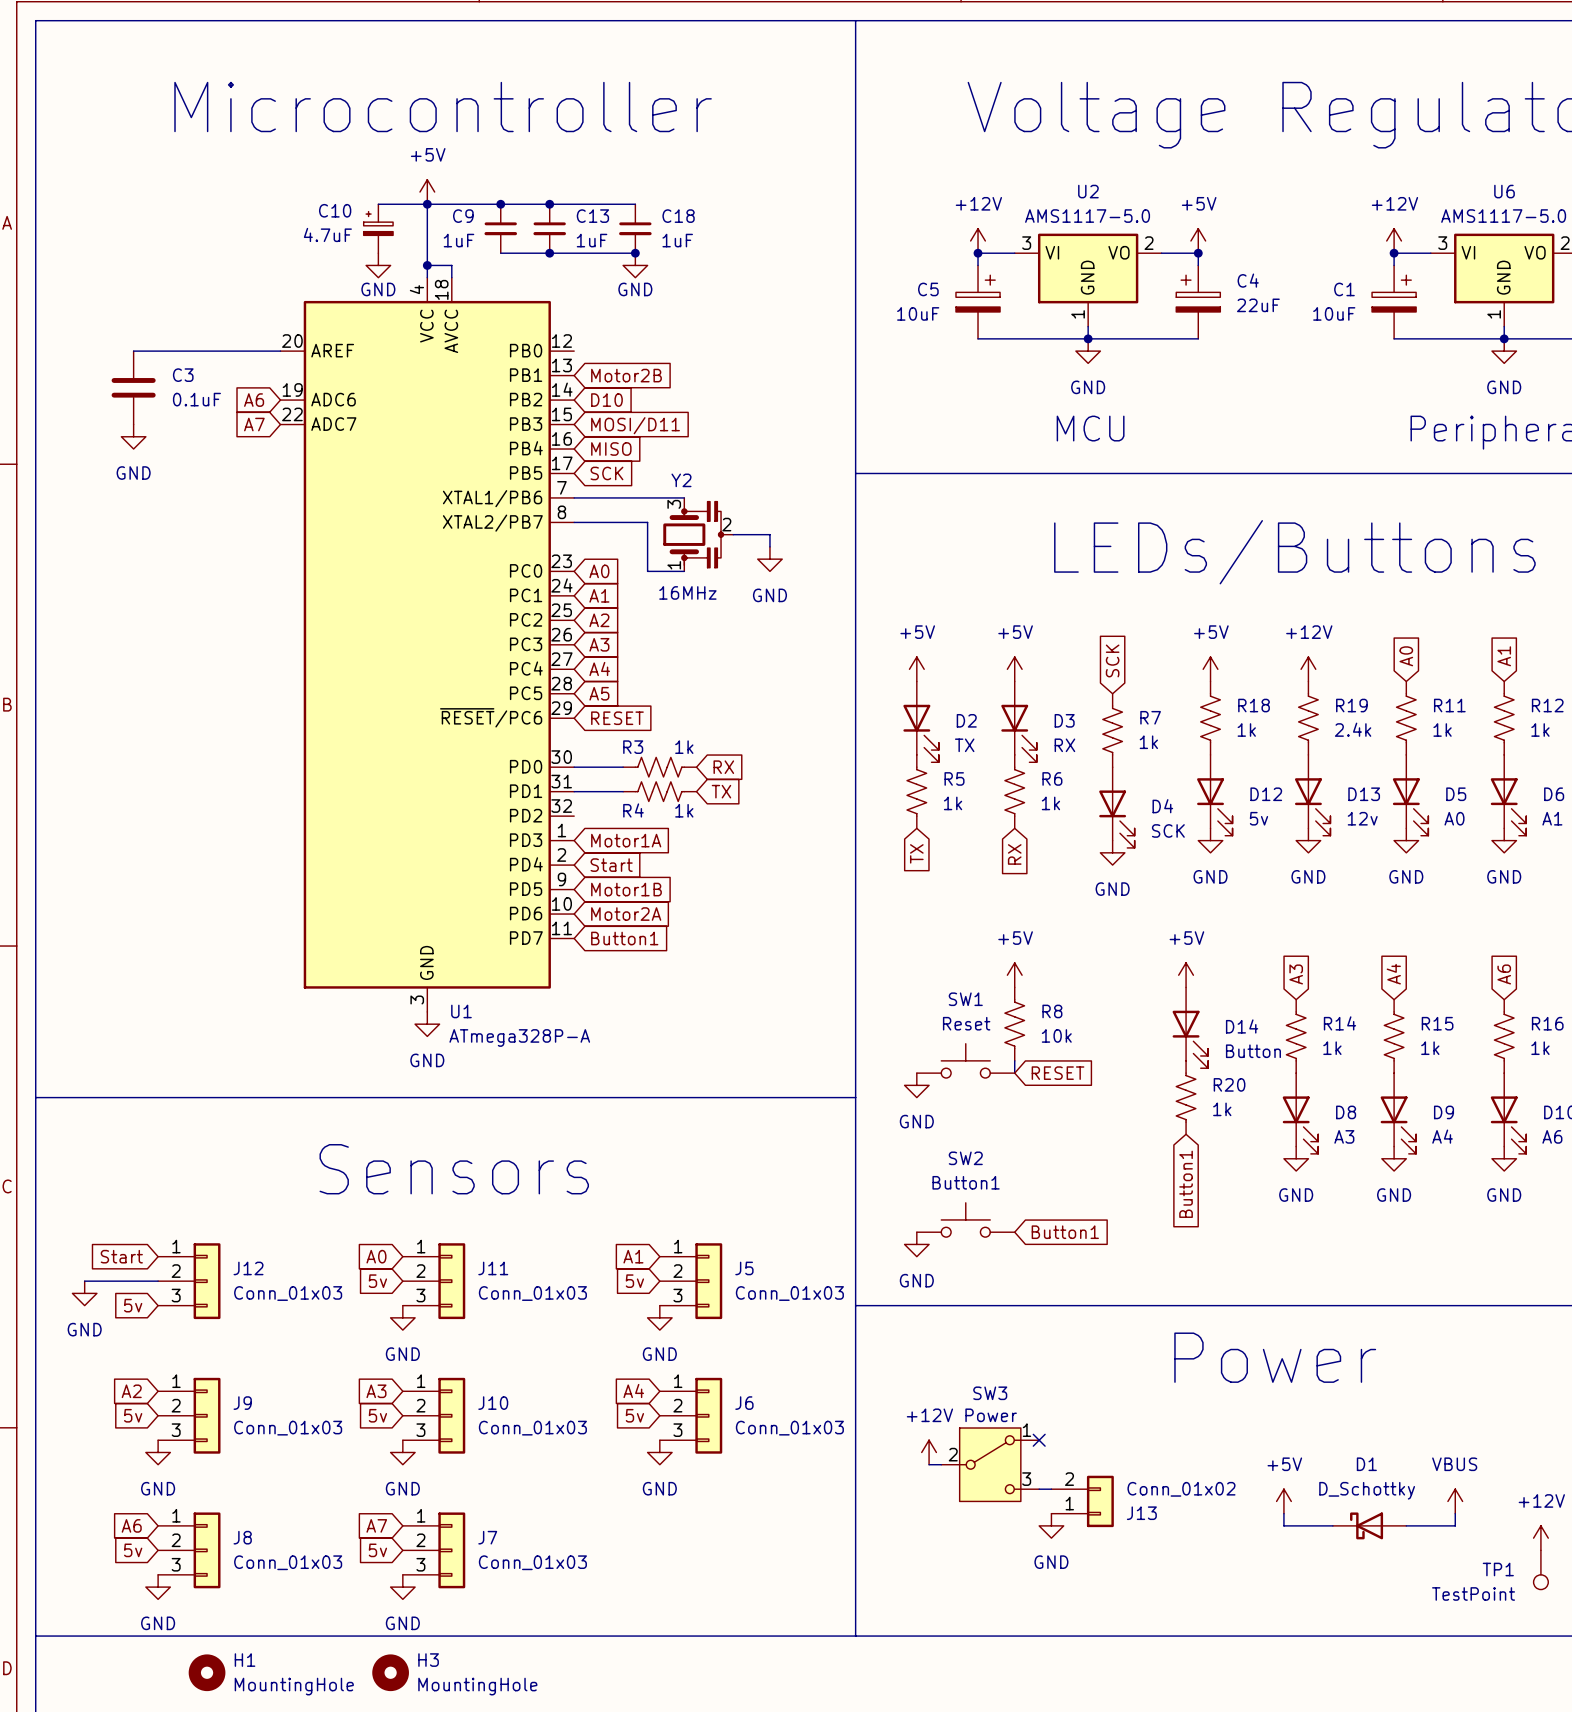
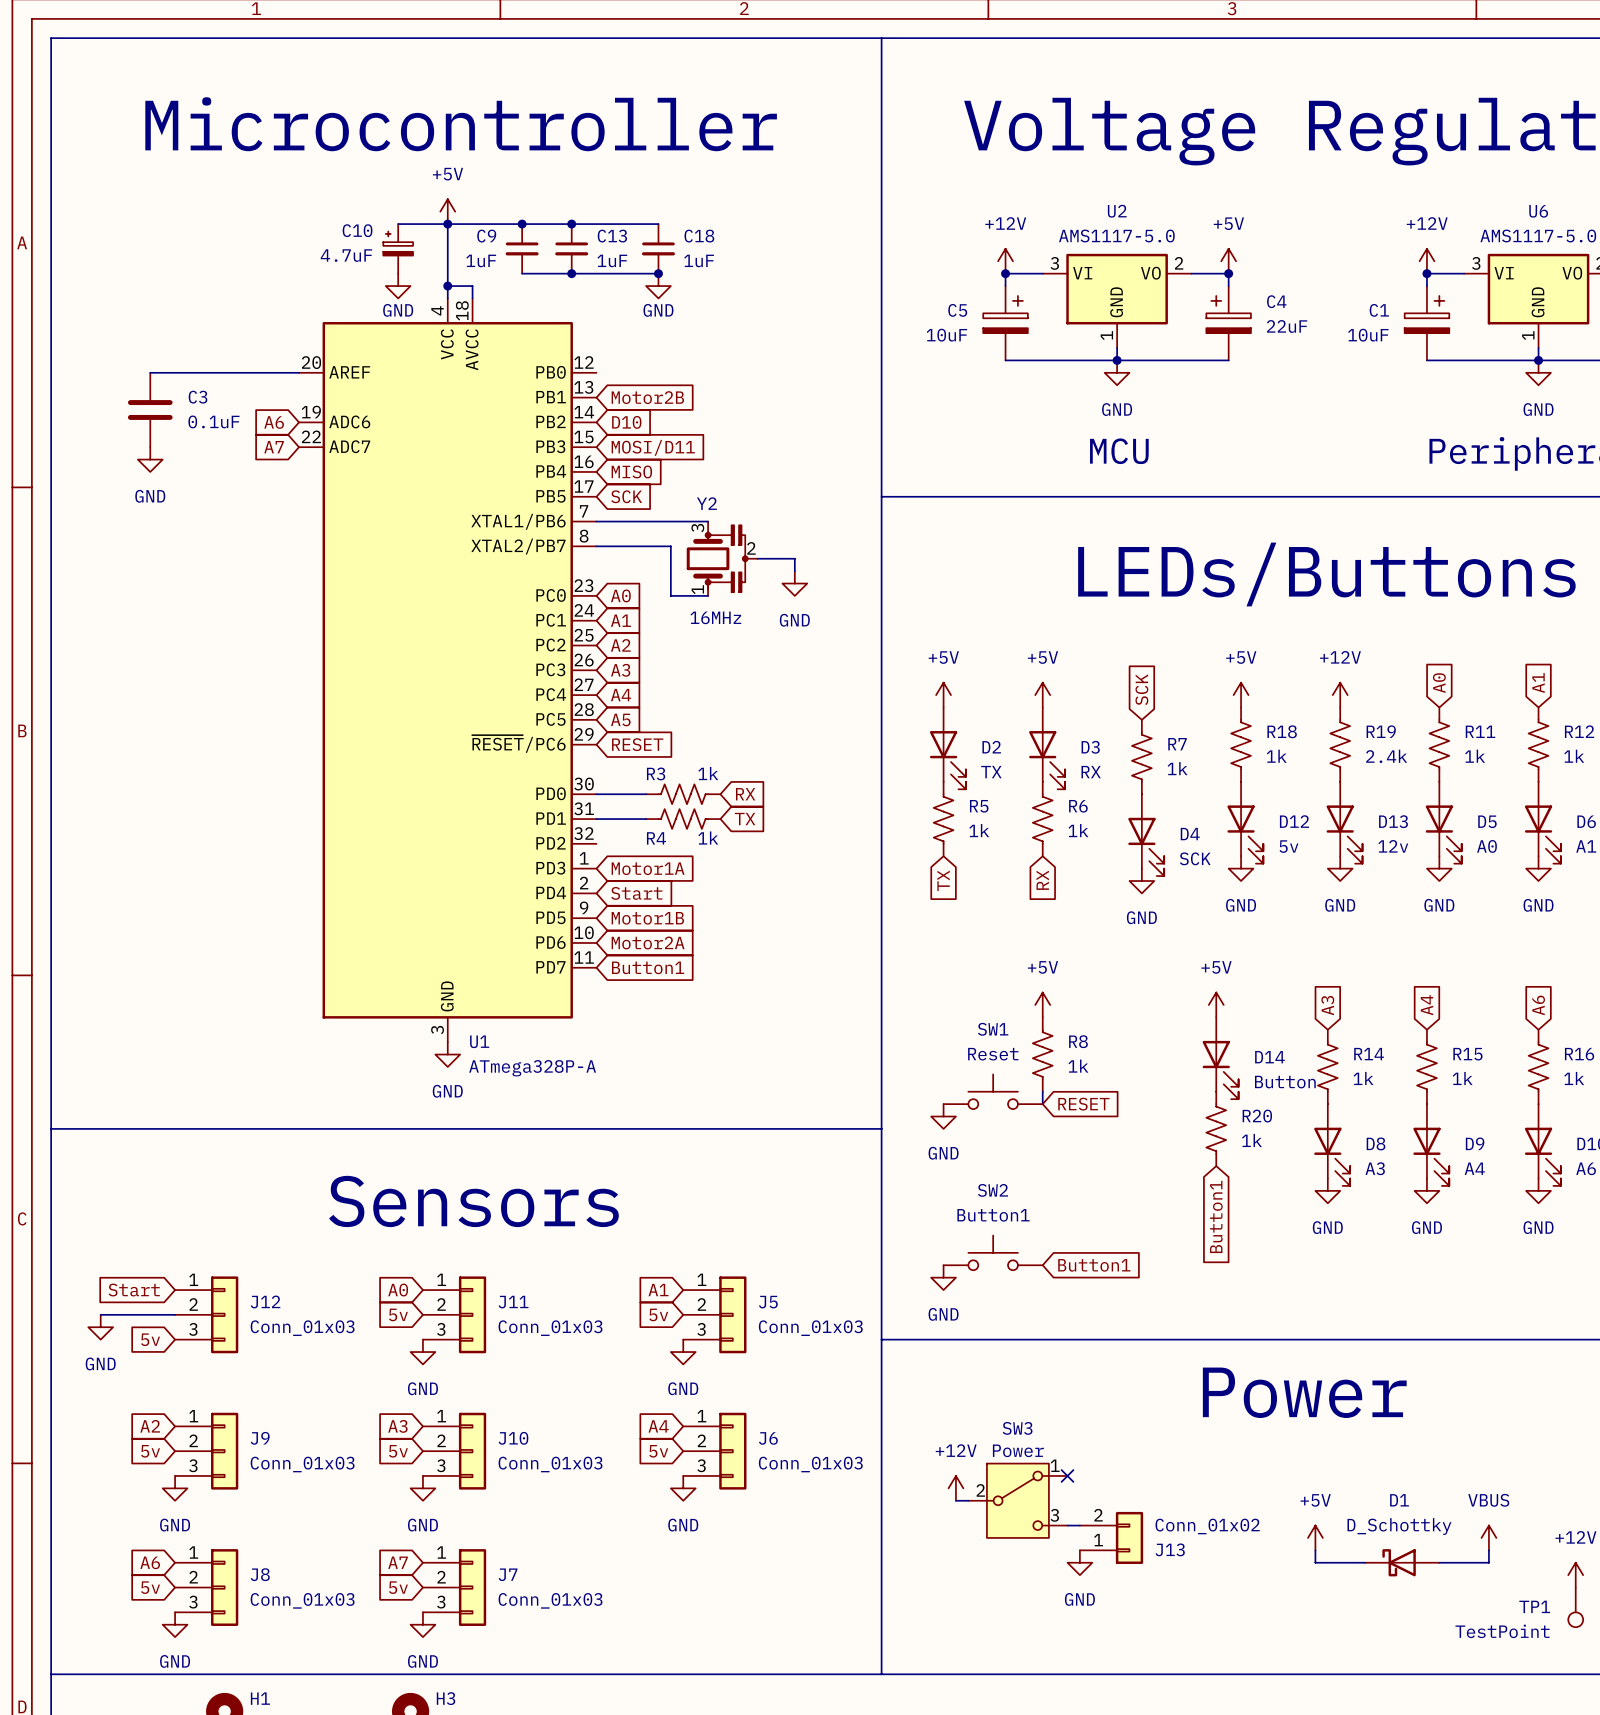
R8 value: 10k (1056, 1035) -> 1k (1078, 1066)

